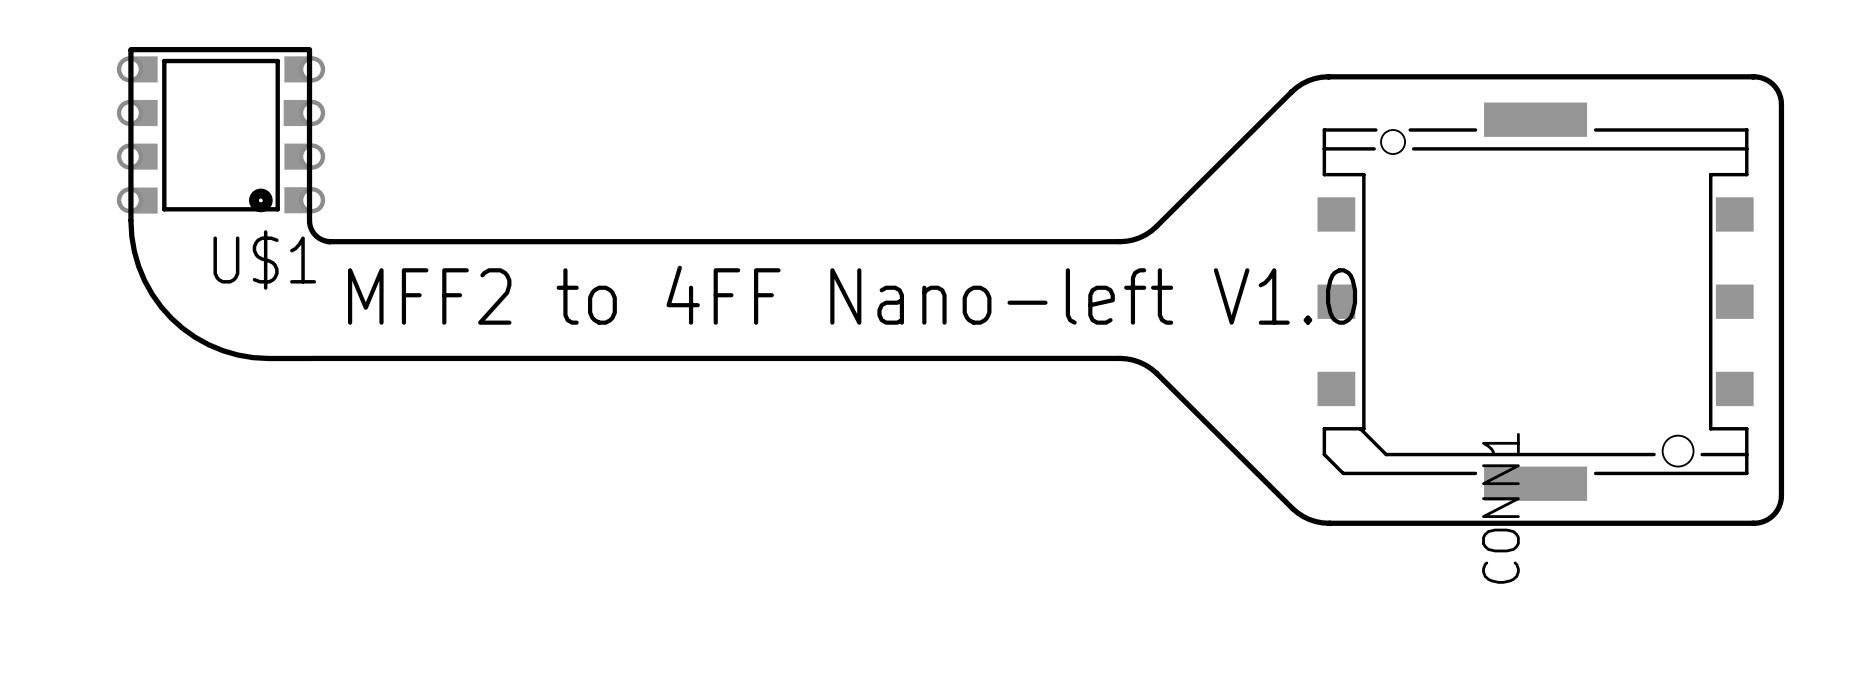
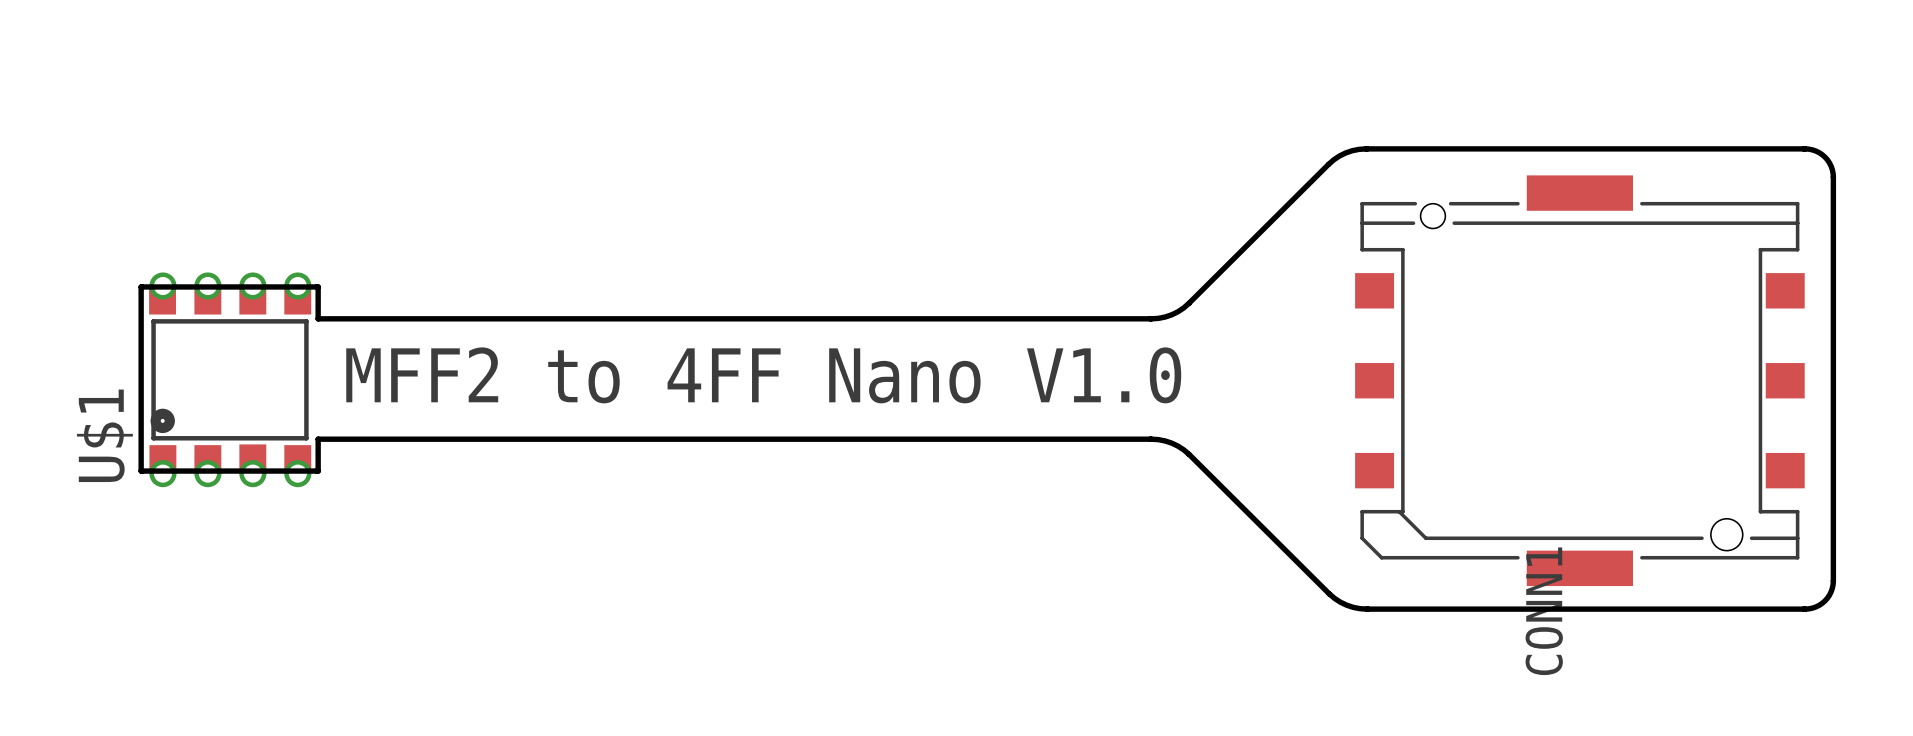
board edge: (130, 49) (309, 49) -> none
board edge: (130, 50) (130, 220) -> none
board edge: (309, 50) (309, 222) (312, 230) (317, 236) (329, 241) -> none
U$1 rotation: 0° (221, 134) -> 90° clockwise (230, 379)
U$1 position: (221, 134) -> (230, 379)
board edge: (130, 220) (134, 251) (144, 280) (160, 306) (182, 328) (208, 344) (237, 355) (268, 358) (310, 358) -> (334, 318) (318, 318) (318, 286) (141, 286) (141, 471) (318, 471) (318, 439)
text: MFF2 to 4FF Nano-left V1.0 (852, 295) -> MFF2 to 4FF Nano V1.0 (763, 375)

